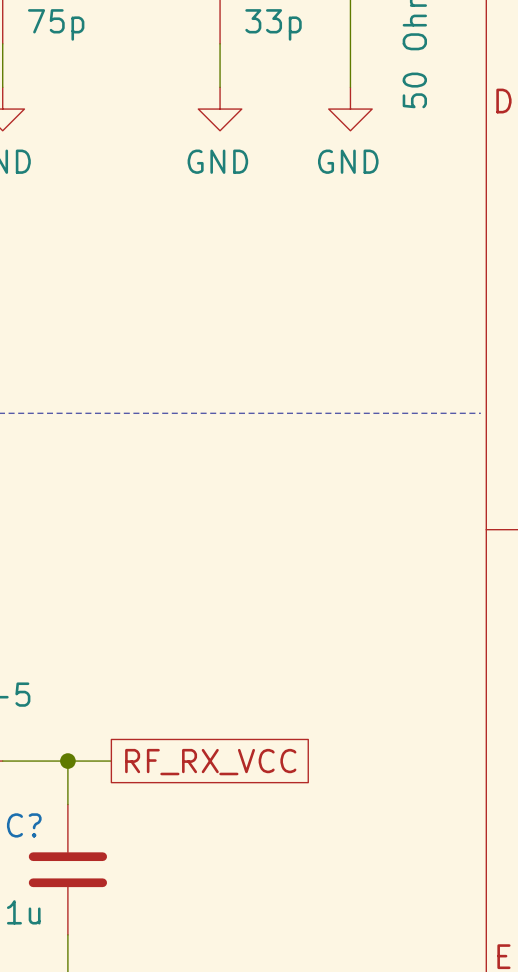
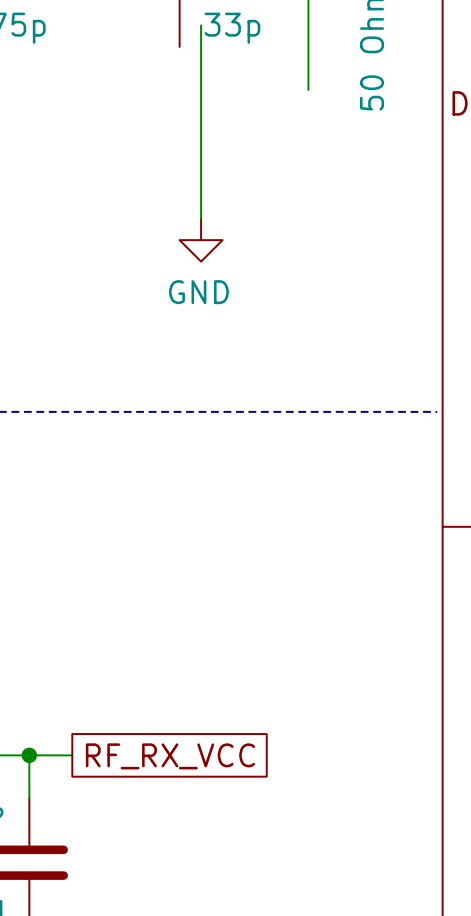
wire: none -> (201, 25) (201, 218)
wire: (220, 43) (220, 87) -> none
power symbol: GND (220, 109) -> none
power symbol: GND (350, 109) -> none
power symbol: none -> GND (201, 240)

